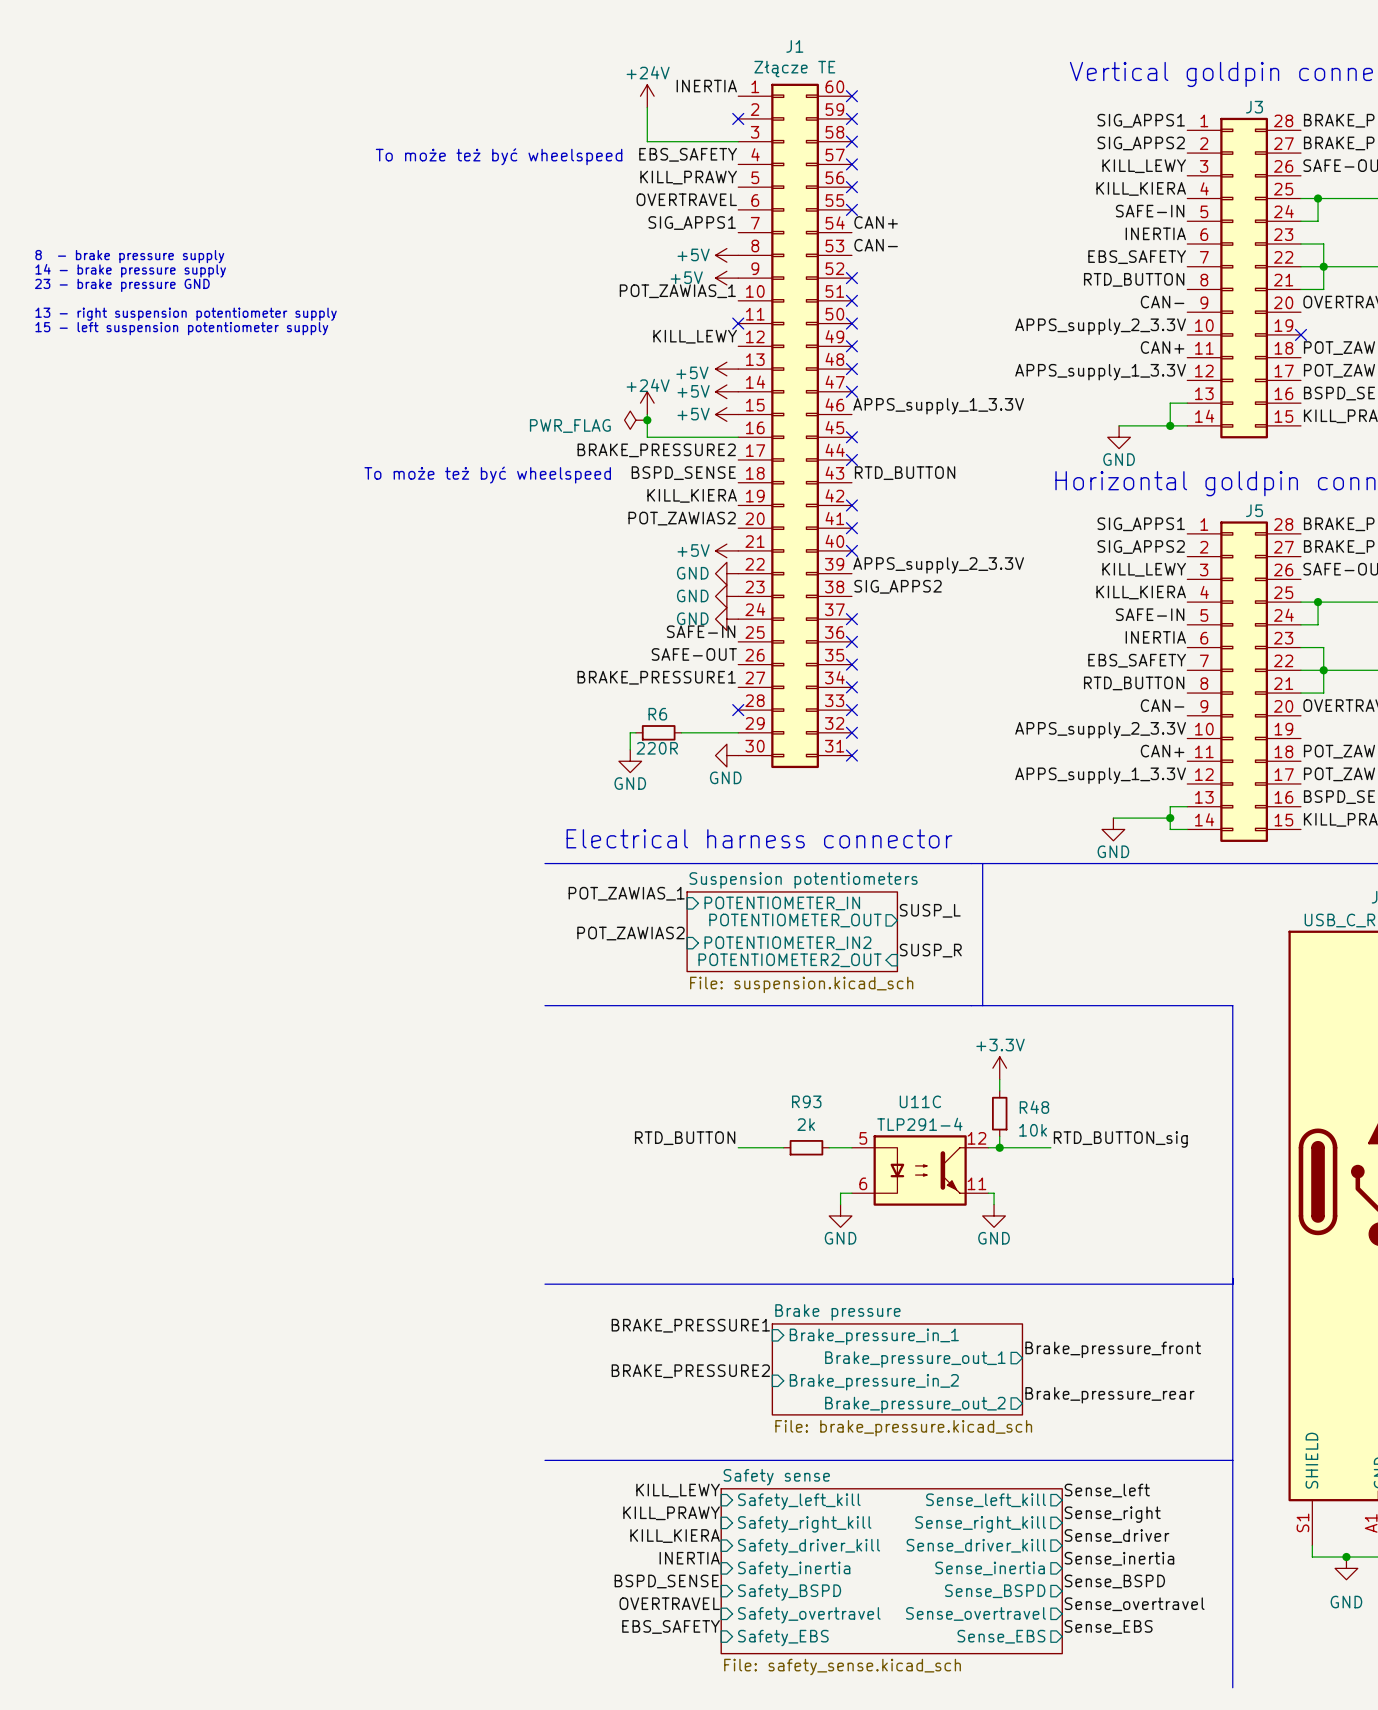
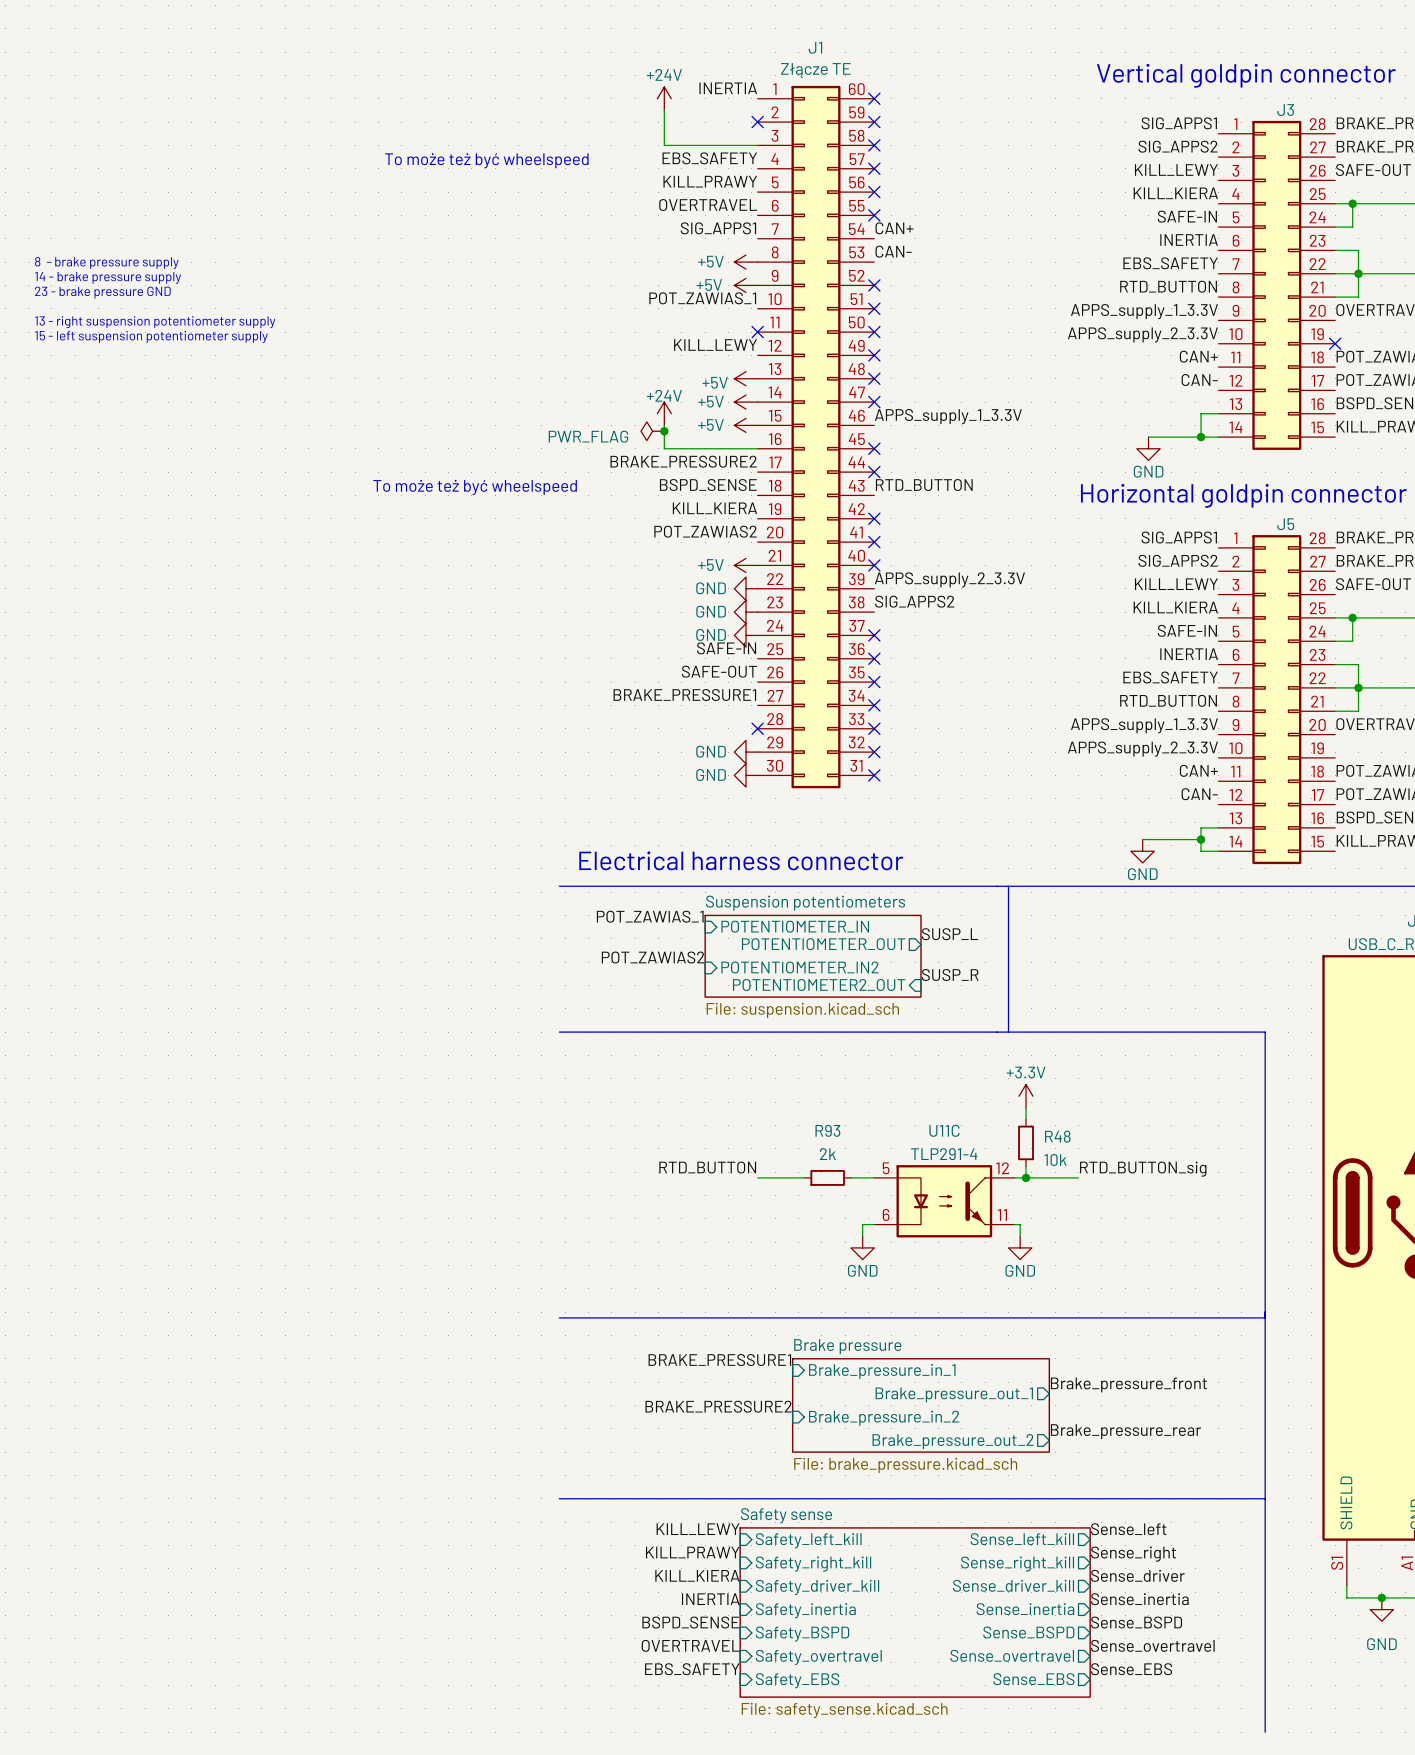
label: CAN- (1162, 302) -> APPS_supply_1_3.3V (1144, 311)
label: APPS_supply_1_3.3V (1100, 372) -> CAN- (1199, 380)
label: CAN- (1162, 705) -> APPS_supply_1_3.3V (1144, 725)
wire: (635, 732) (630, 732) (630, 749) -> none
R6: 220R (658, 732) -> none
wire: (681, 732) (738, 732) -> none
power symbol rotation: 0° (630, 761) -> 90° clockwise (745, 752)
power symbol position: GND (630, 761) -> GND (745, 752)
label: APPS_supply_1_3.3V (1100, 775) -> CAN- (1199, 794)
power symbol text position: GND (725, 777) -> GND (711, 774)

